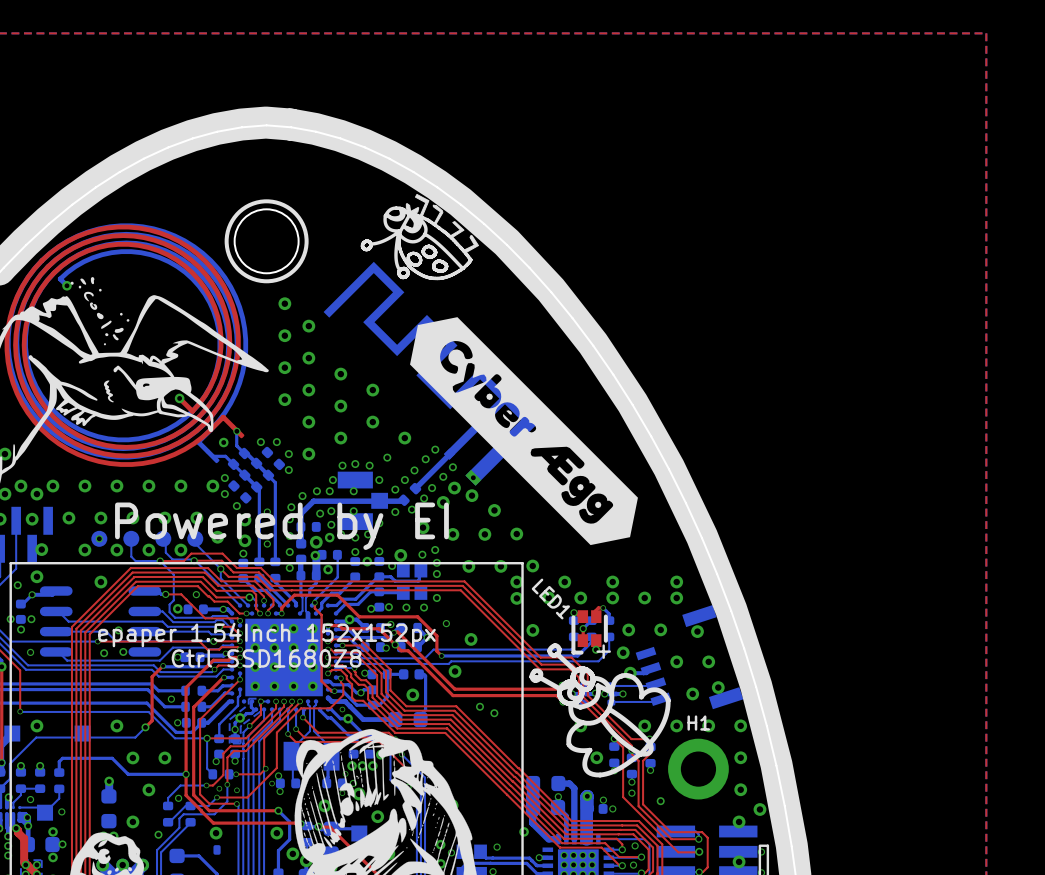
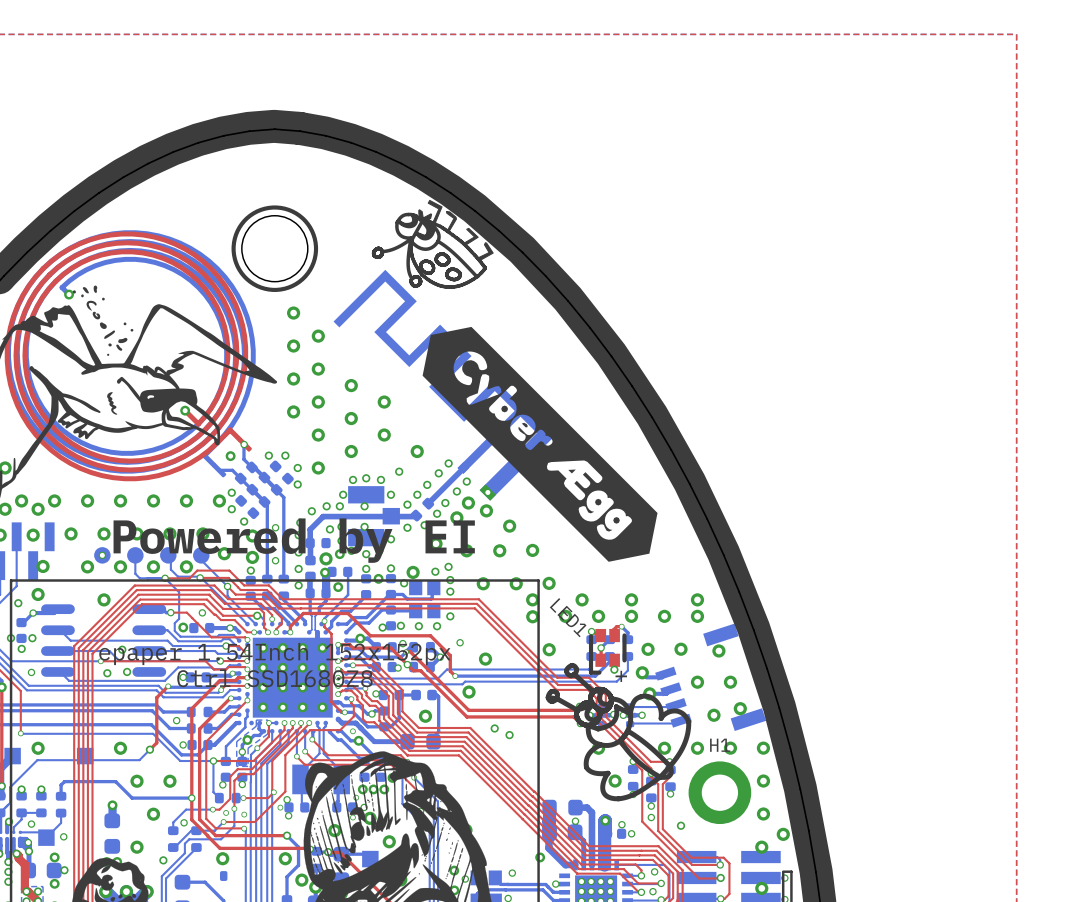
bottom track: none -> (665, 673) (662, 677) (646, 677)

